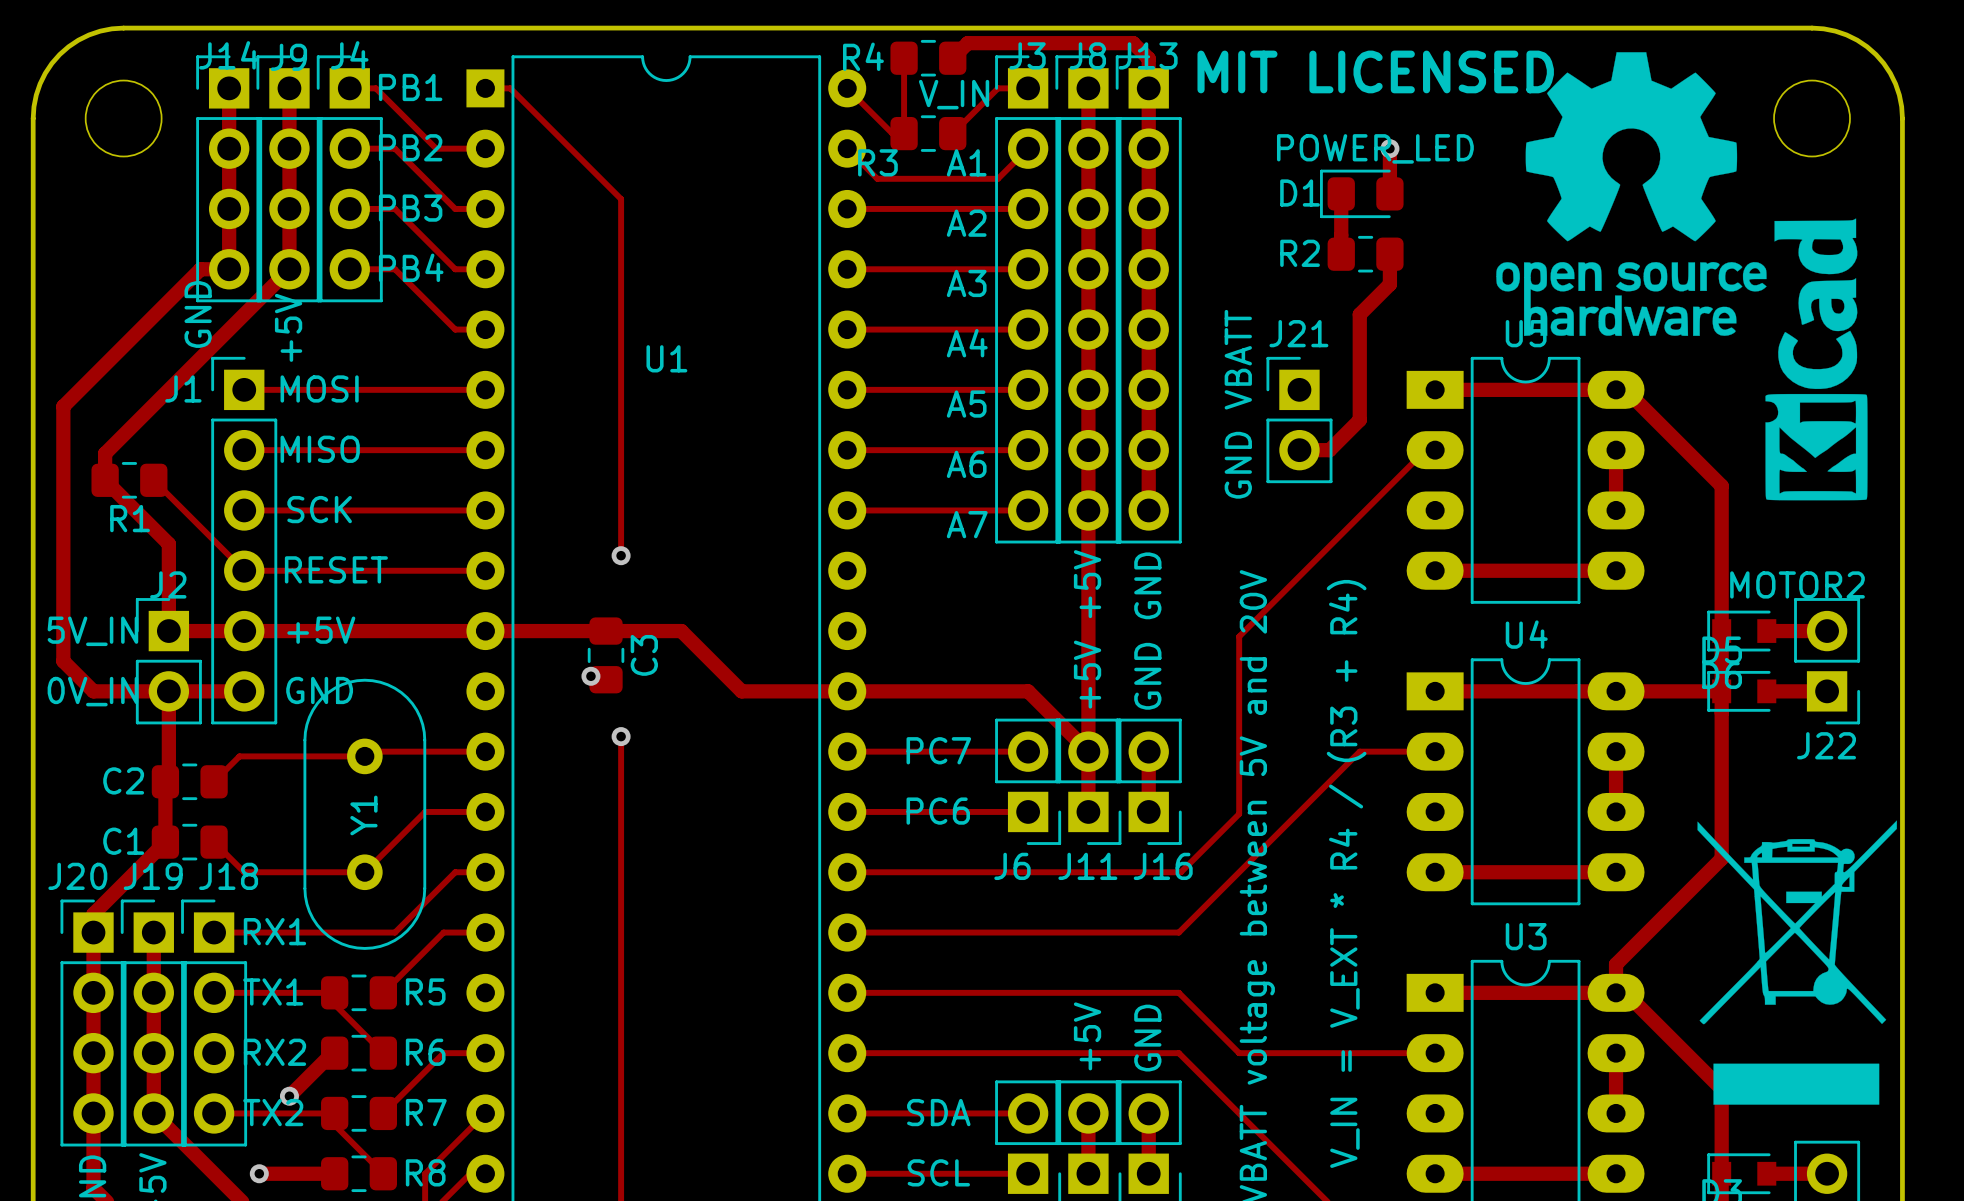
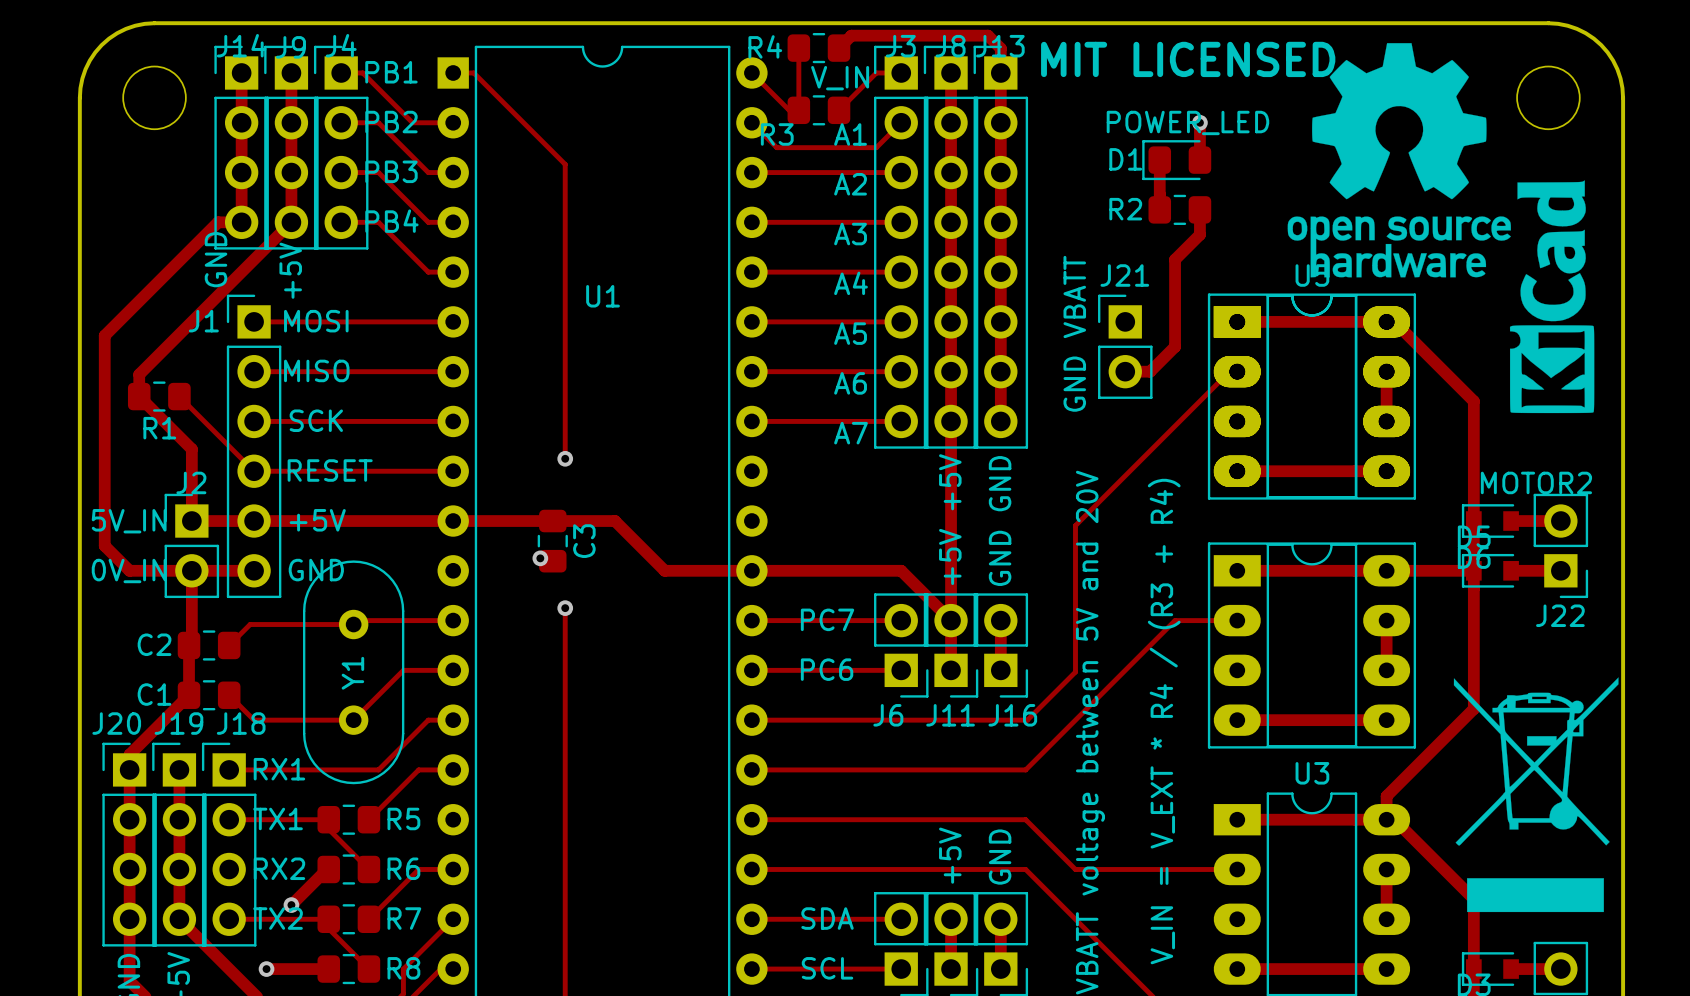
part: none -> (1311, 396)
U4: (1525, 781) -> none
part: none -> (1311, 645)

